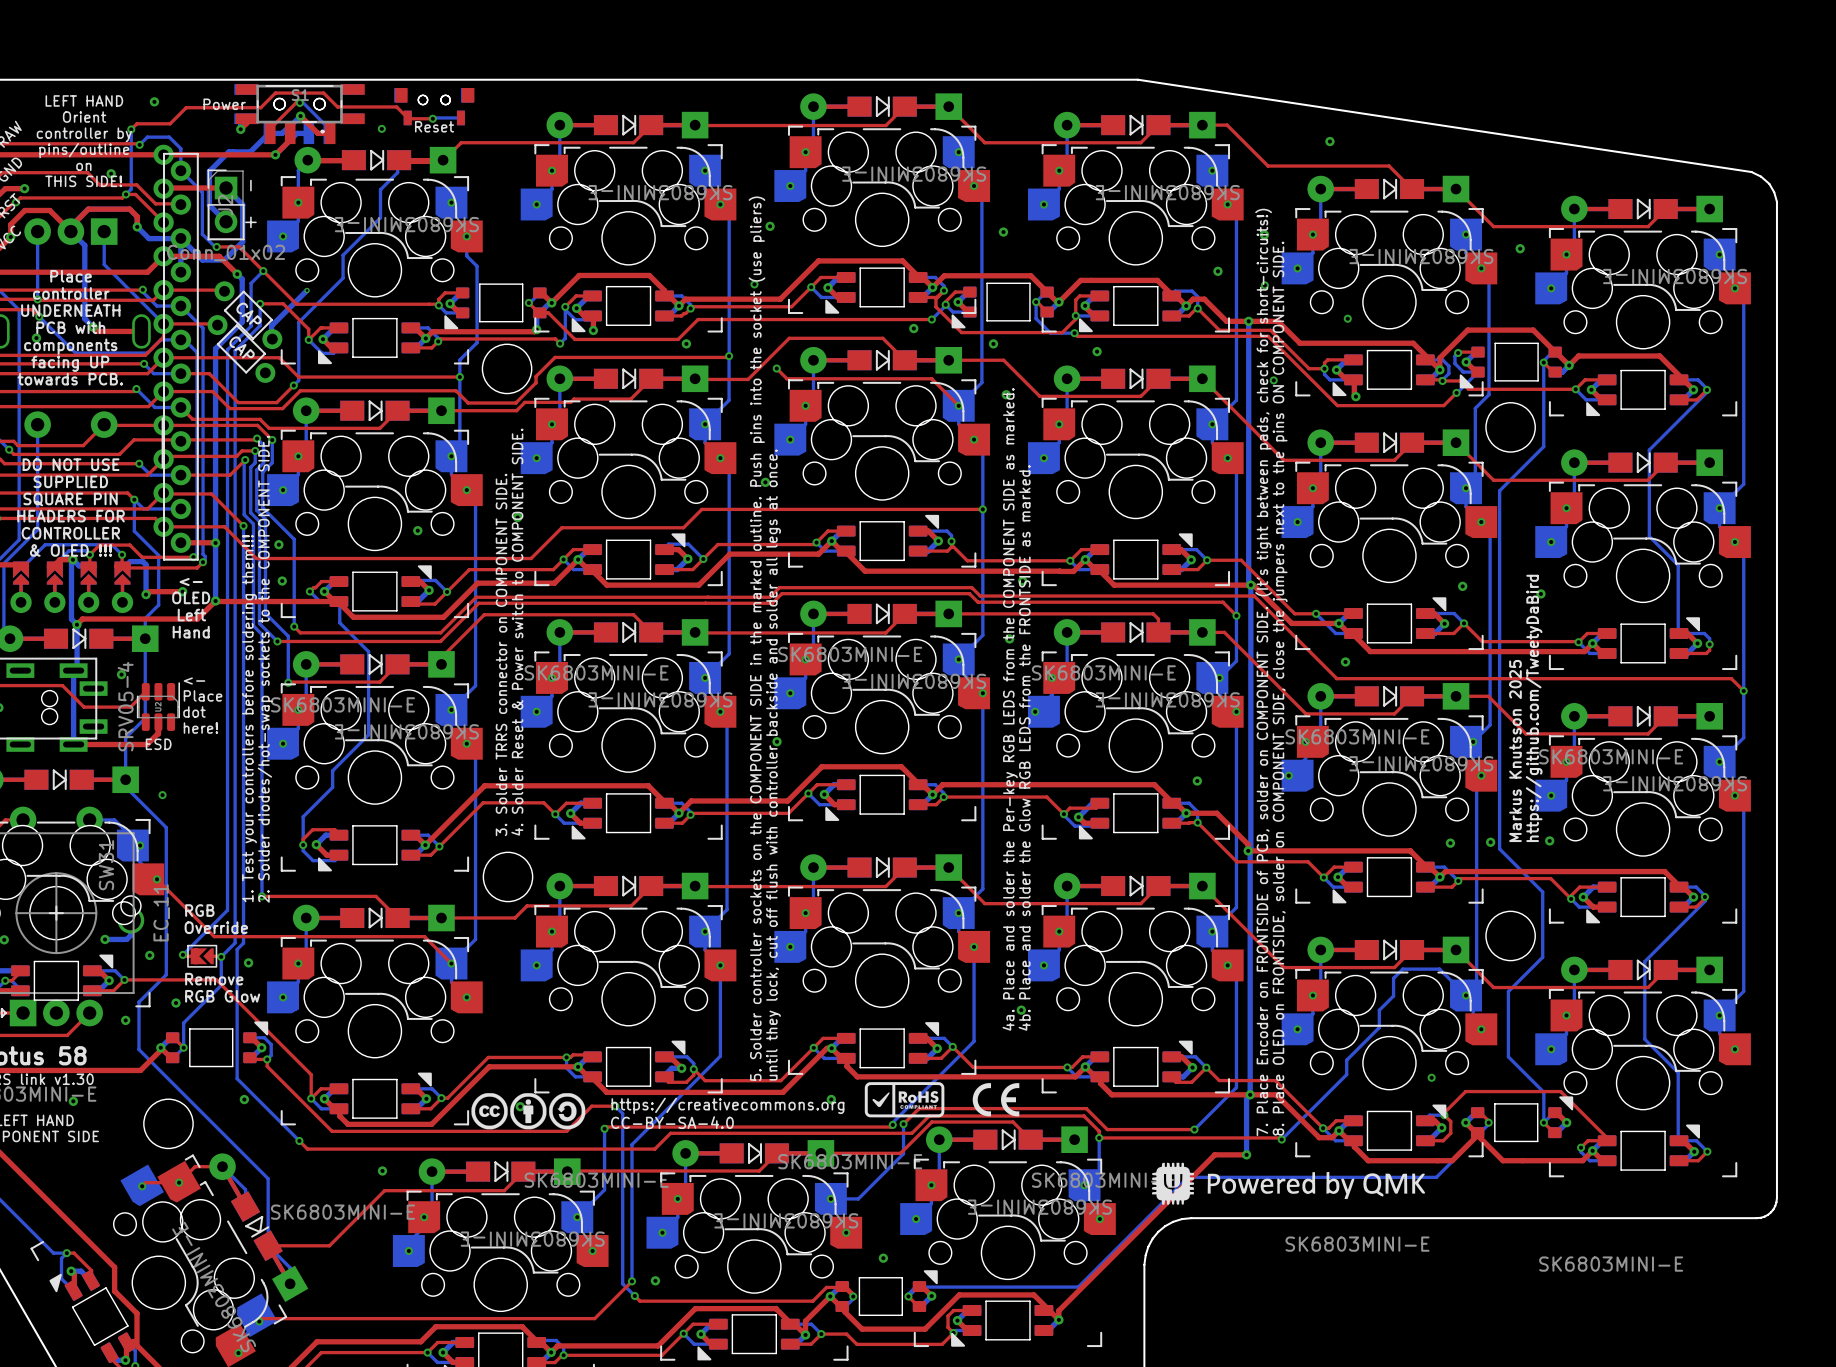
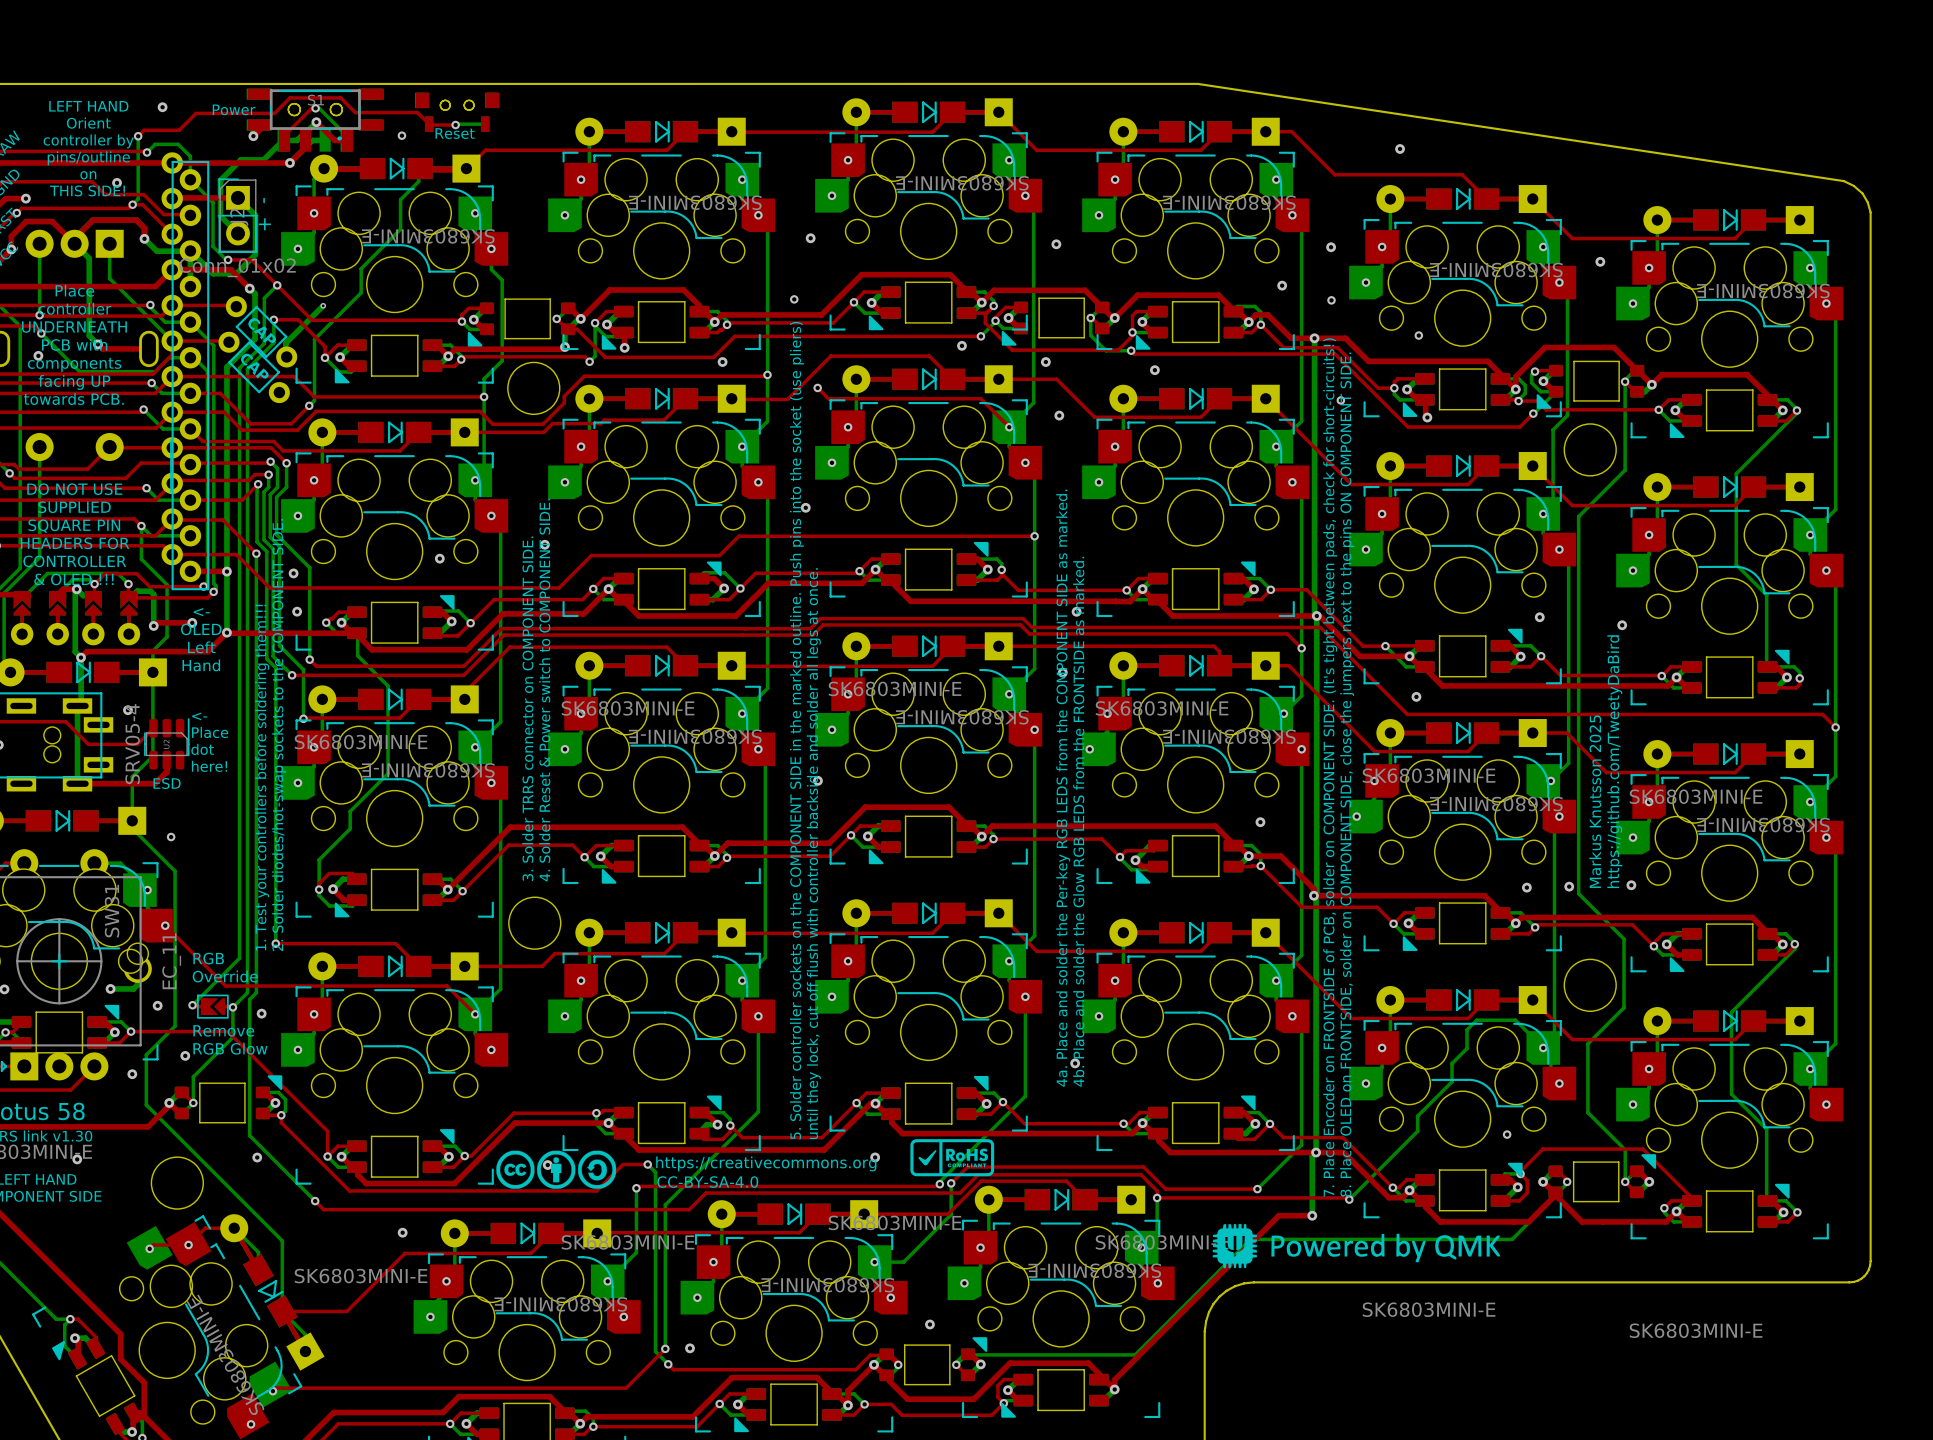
drawing: [972, 1083, 1020, 1117] -> none

